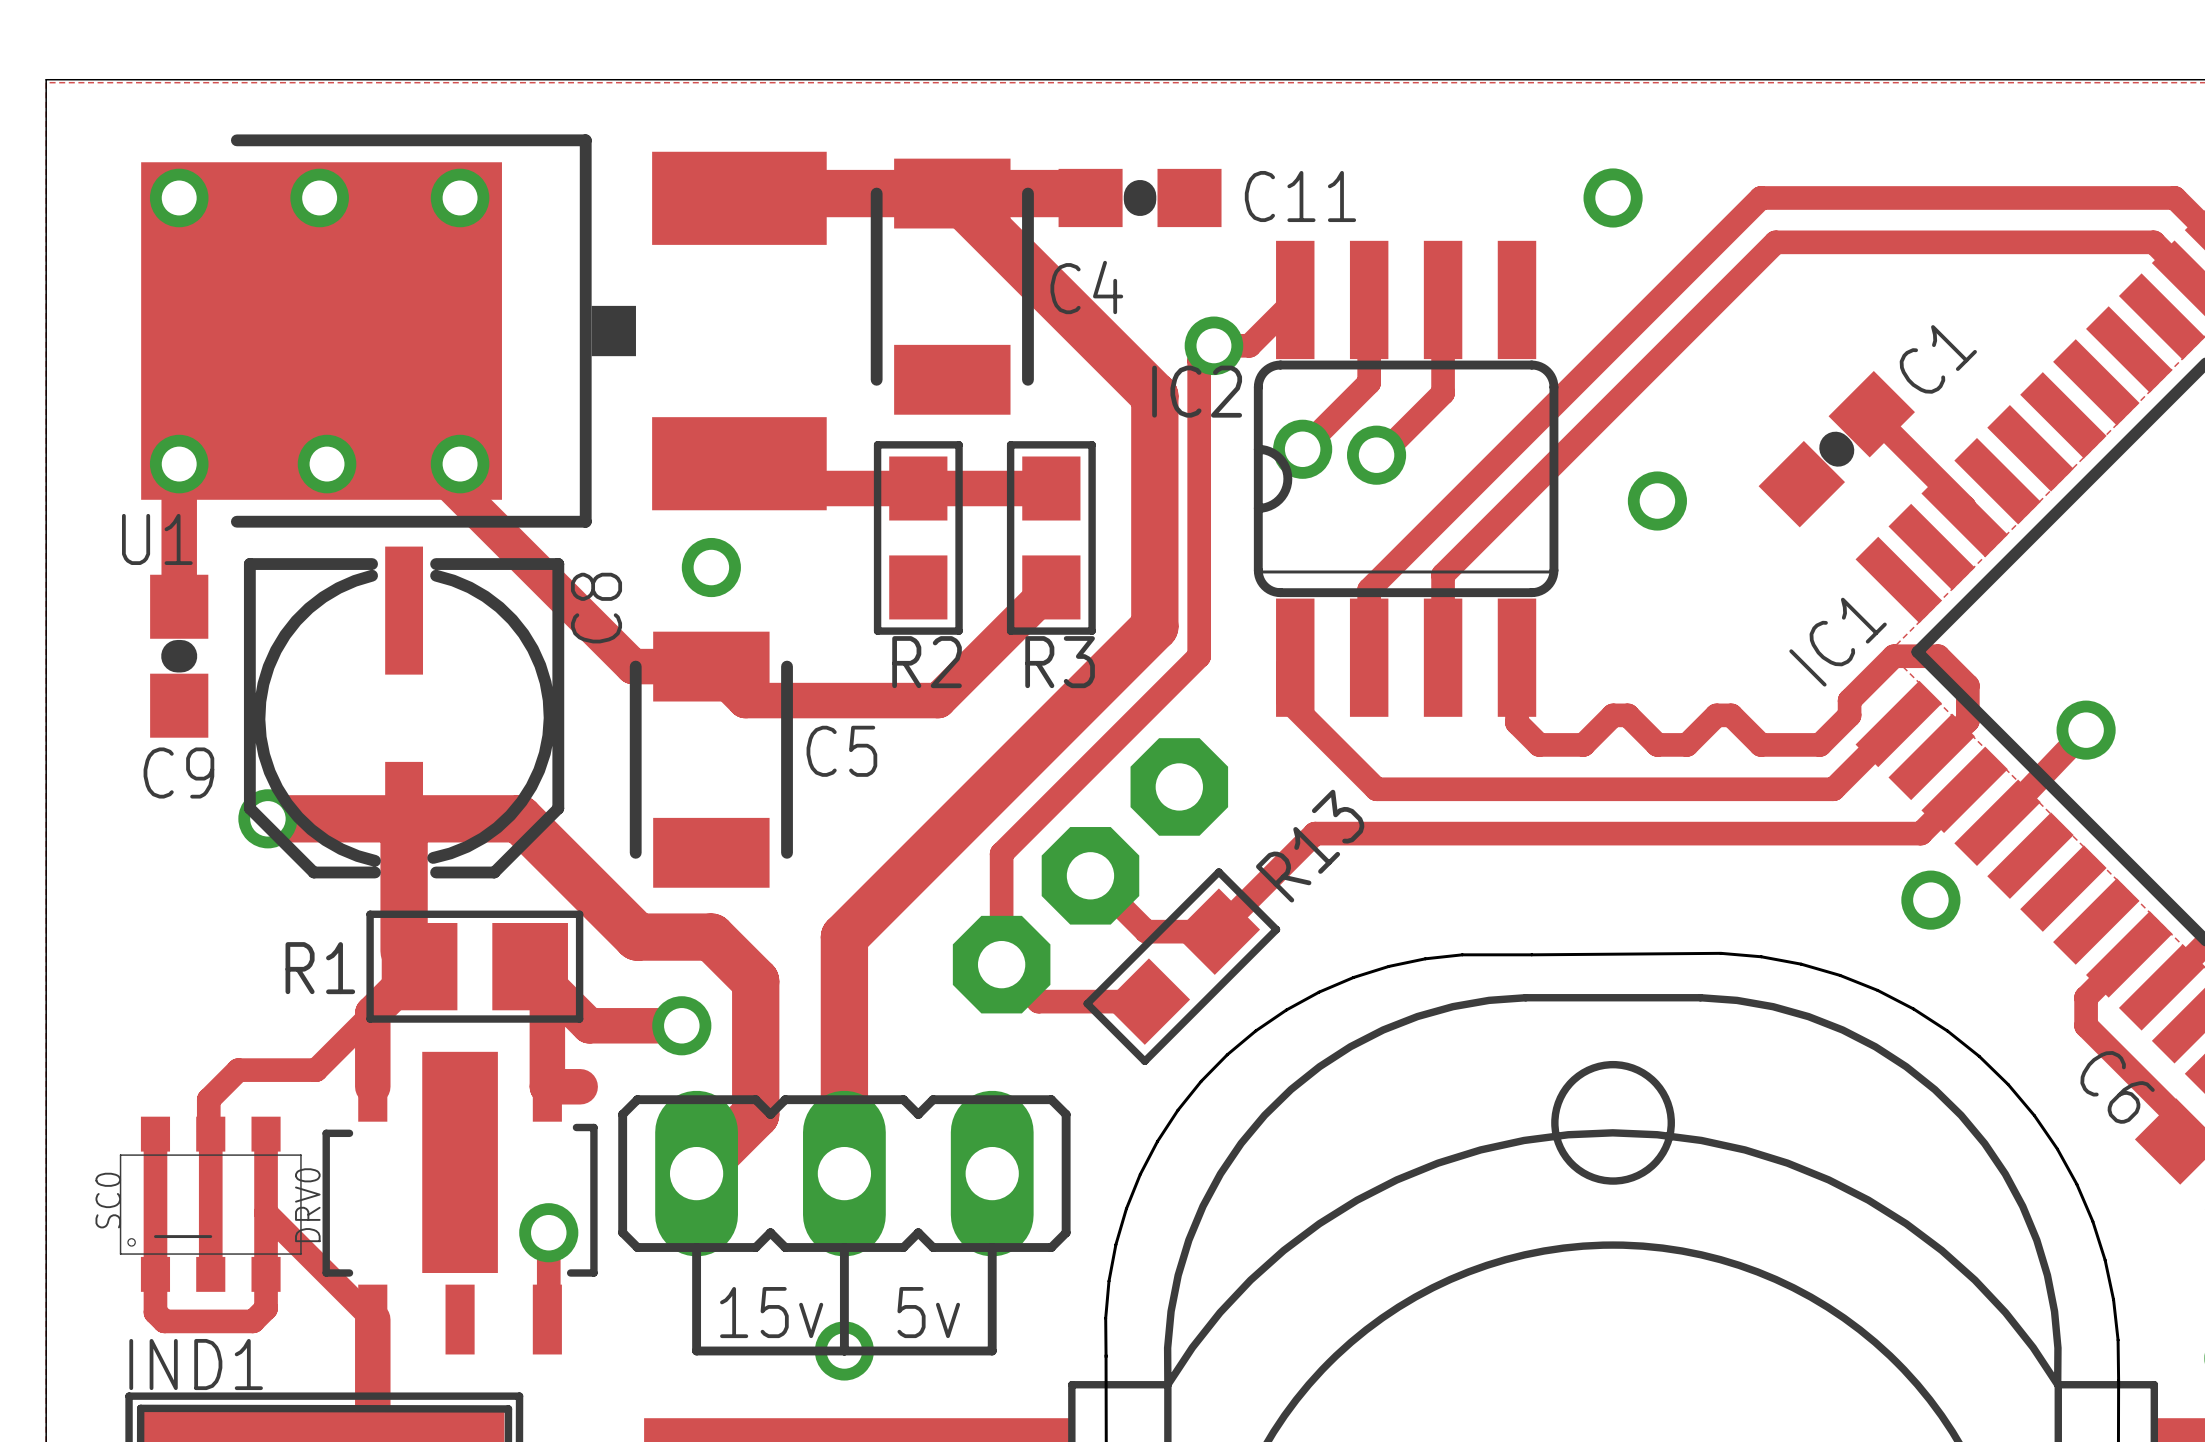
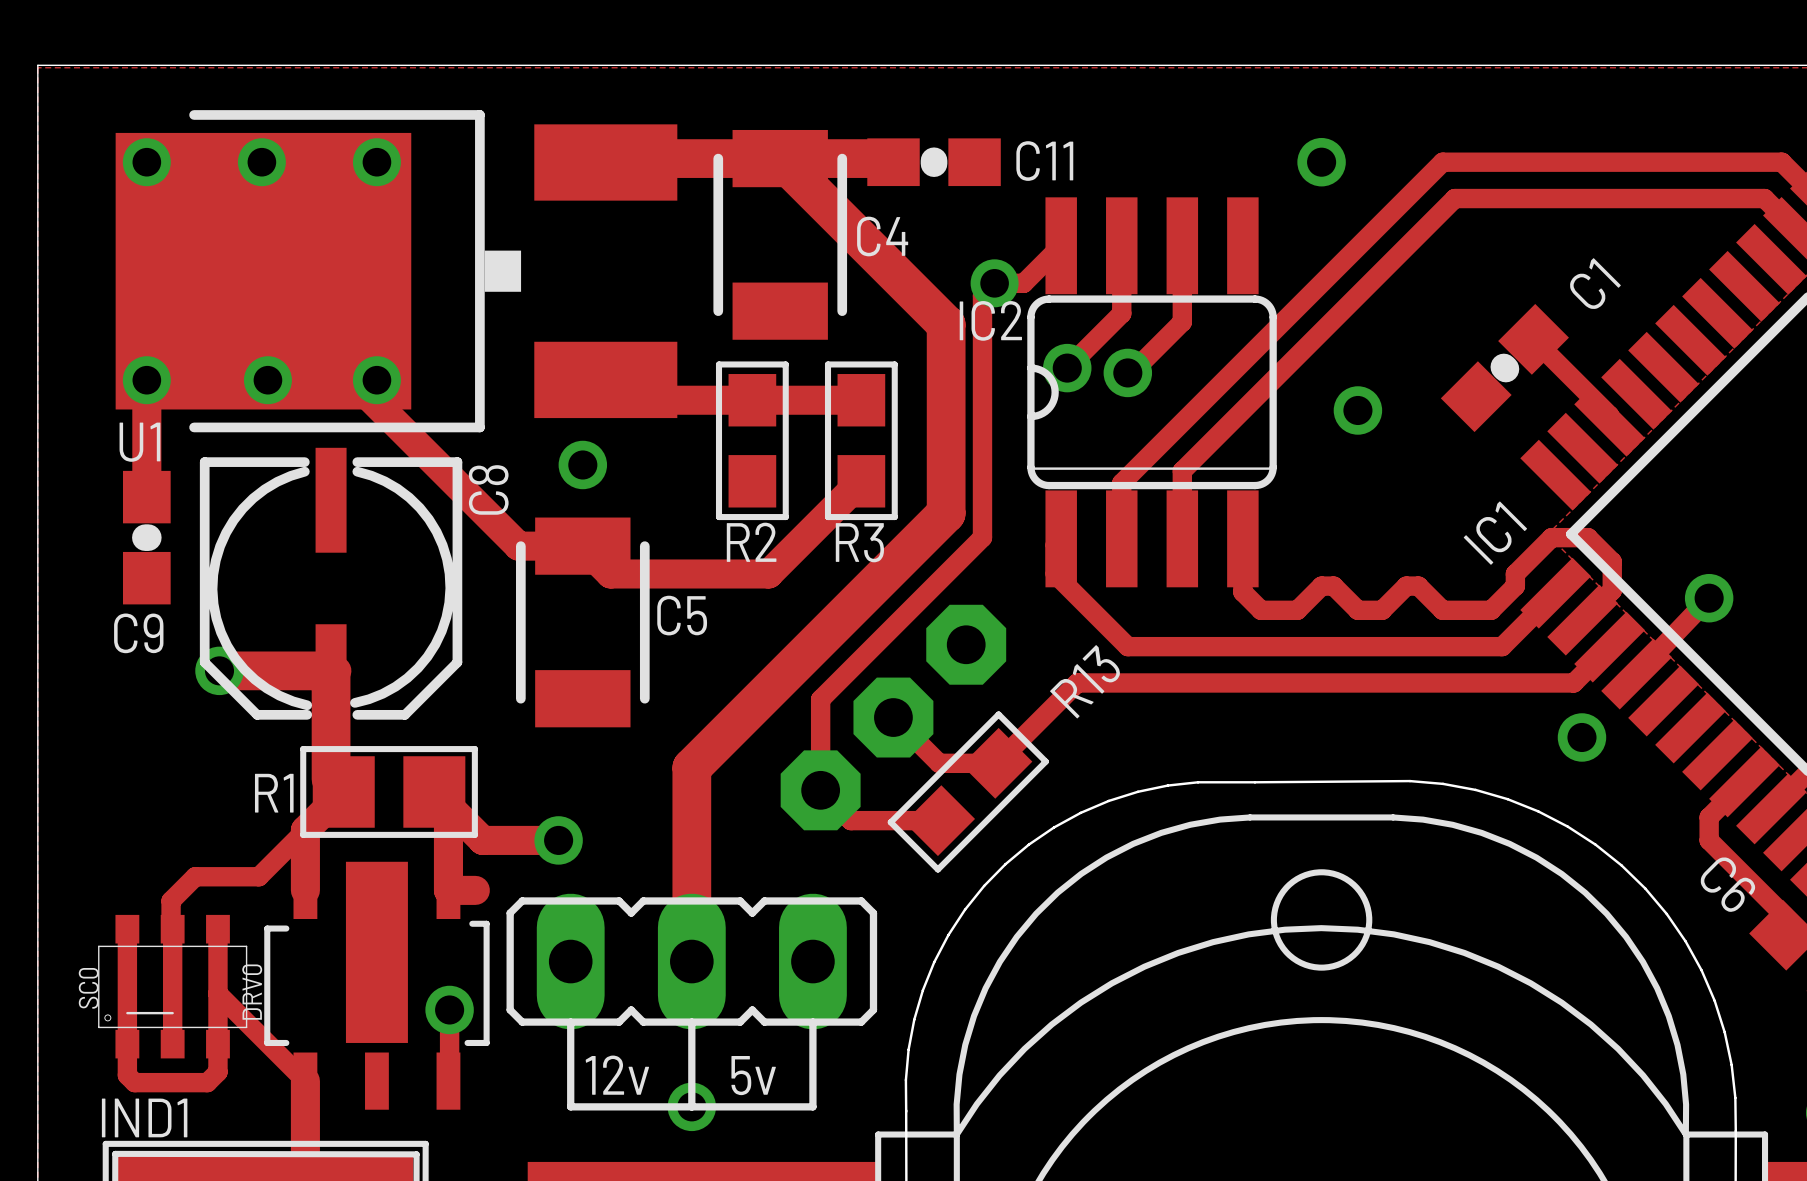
track: (411, 818) (519, 818) (637, 937) (711, 937) (755, 981) (755, 1114) (696, 1173) -> none
text: 15v (771, 1312) -> 12v (617, 1075)

